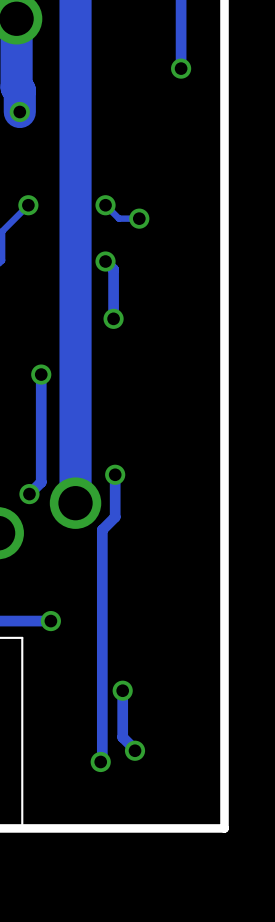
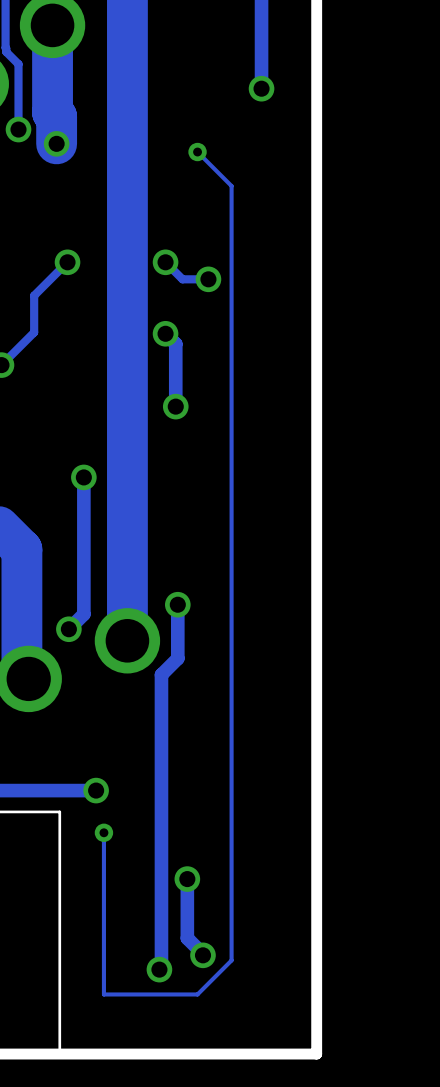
track: none -> (197, 152) (231, 186) (231, 960) (197, 994) (103, 994) (103, 832)
via: none -> (197, 152)
via: none -> (103, 832)

